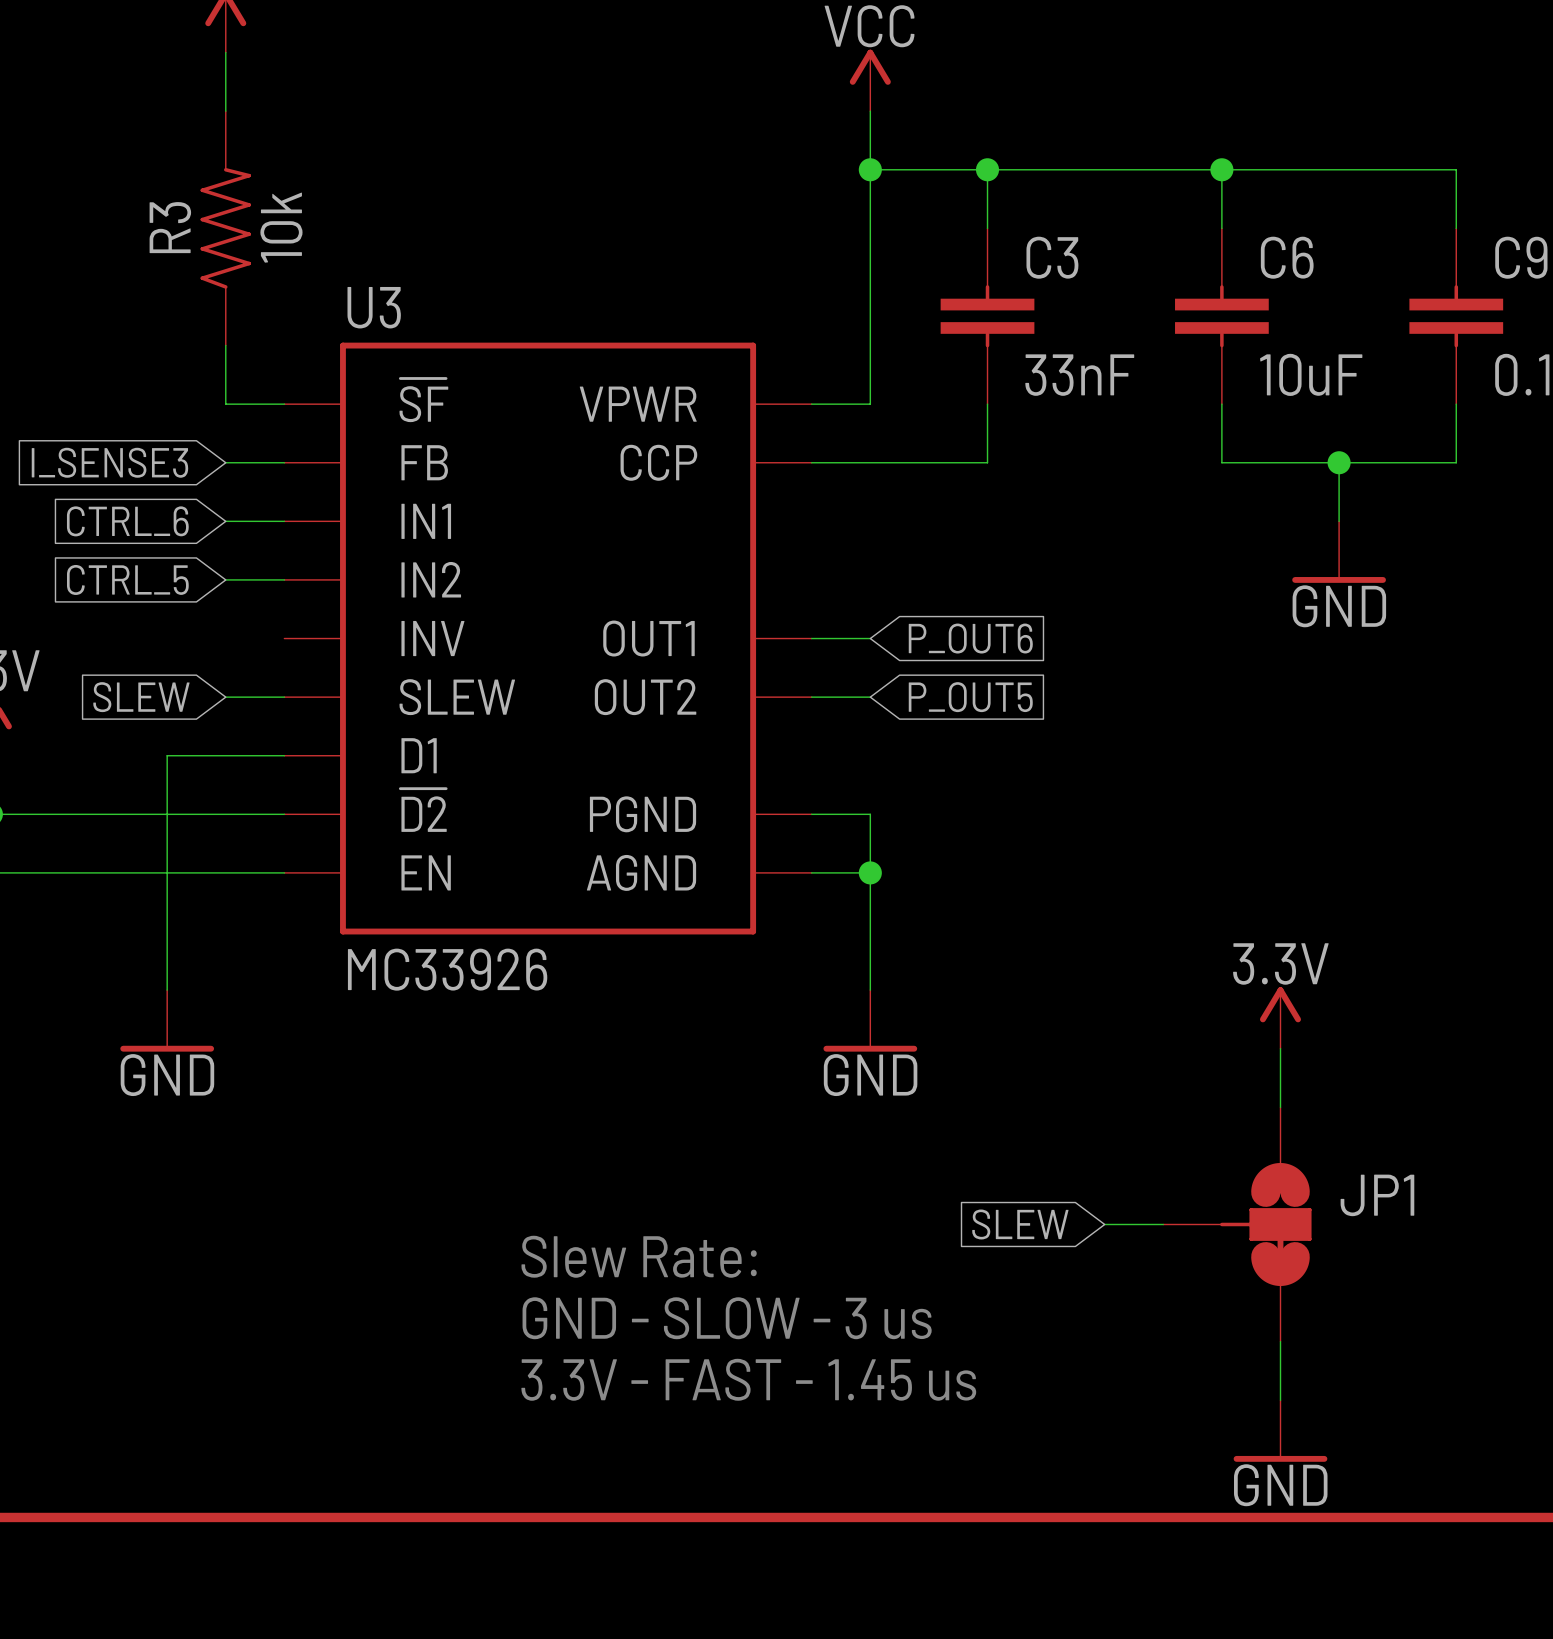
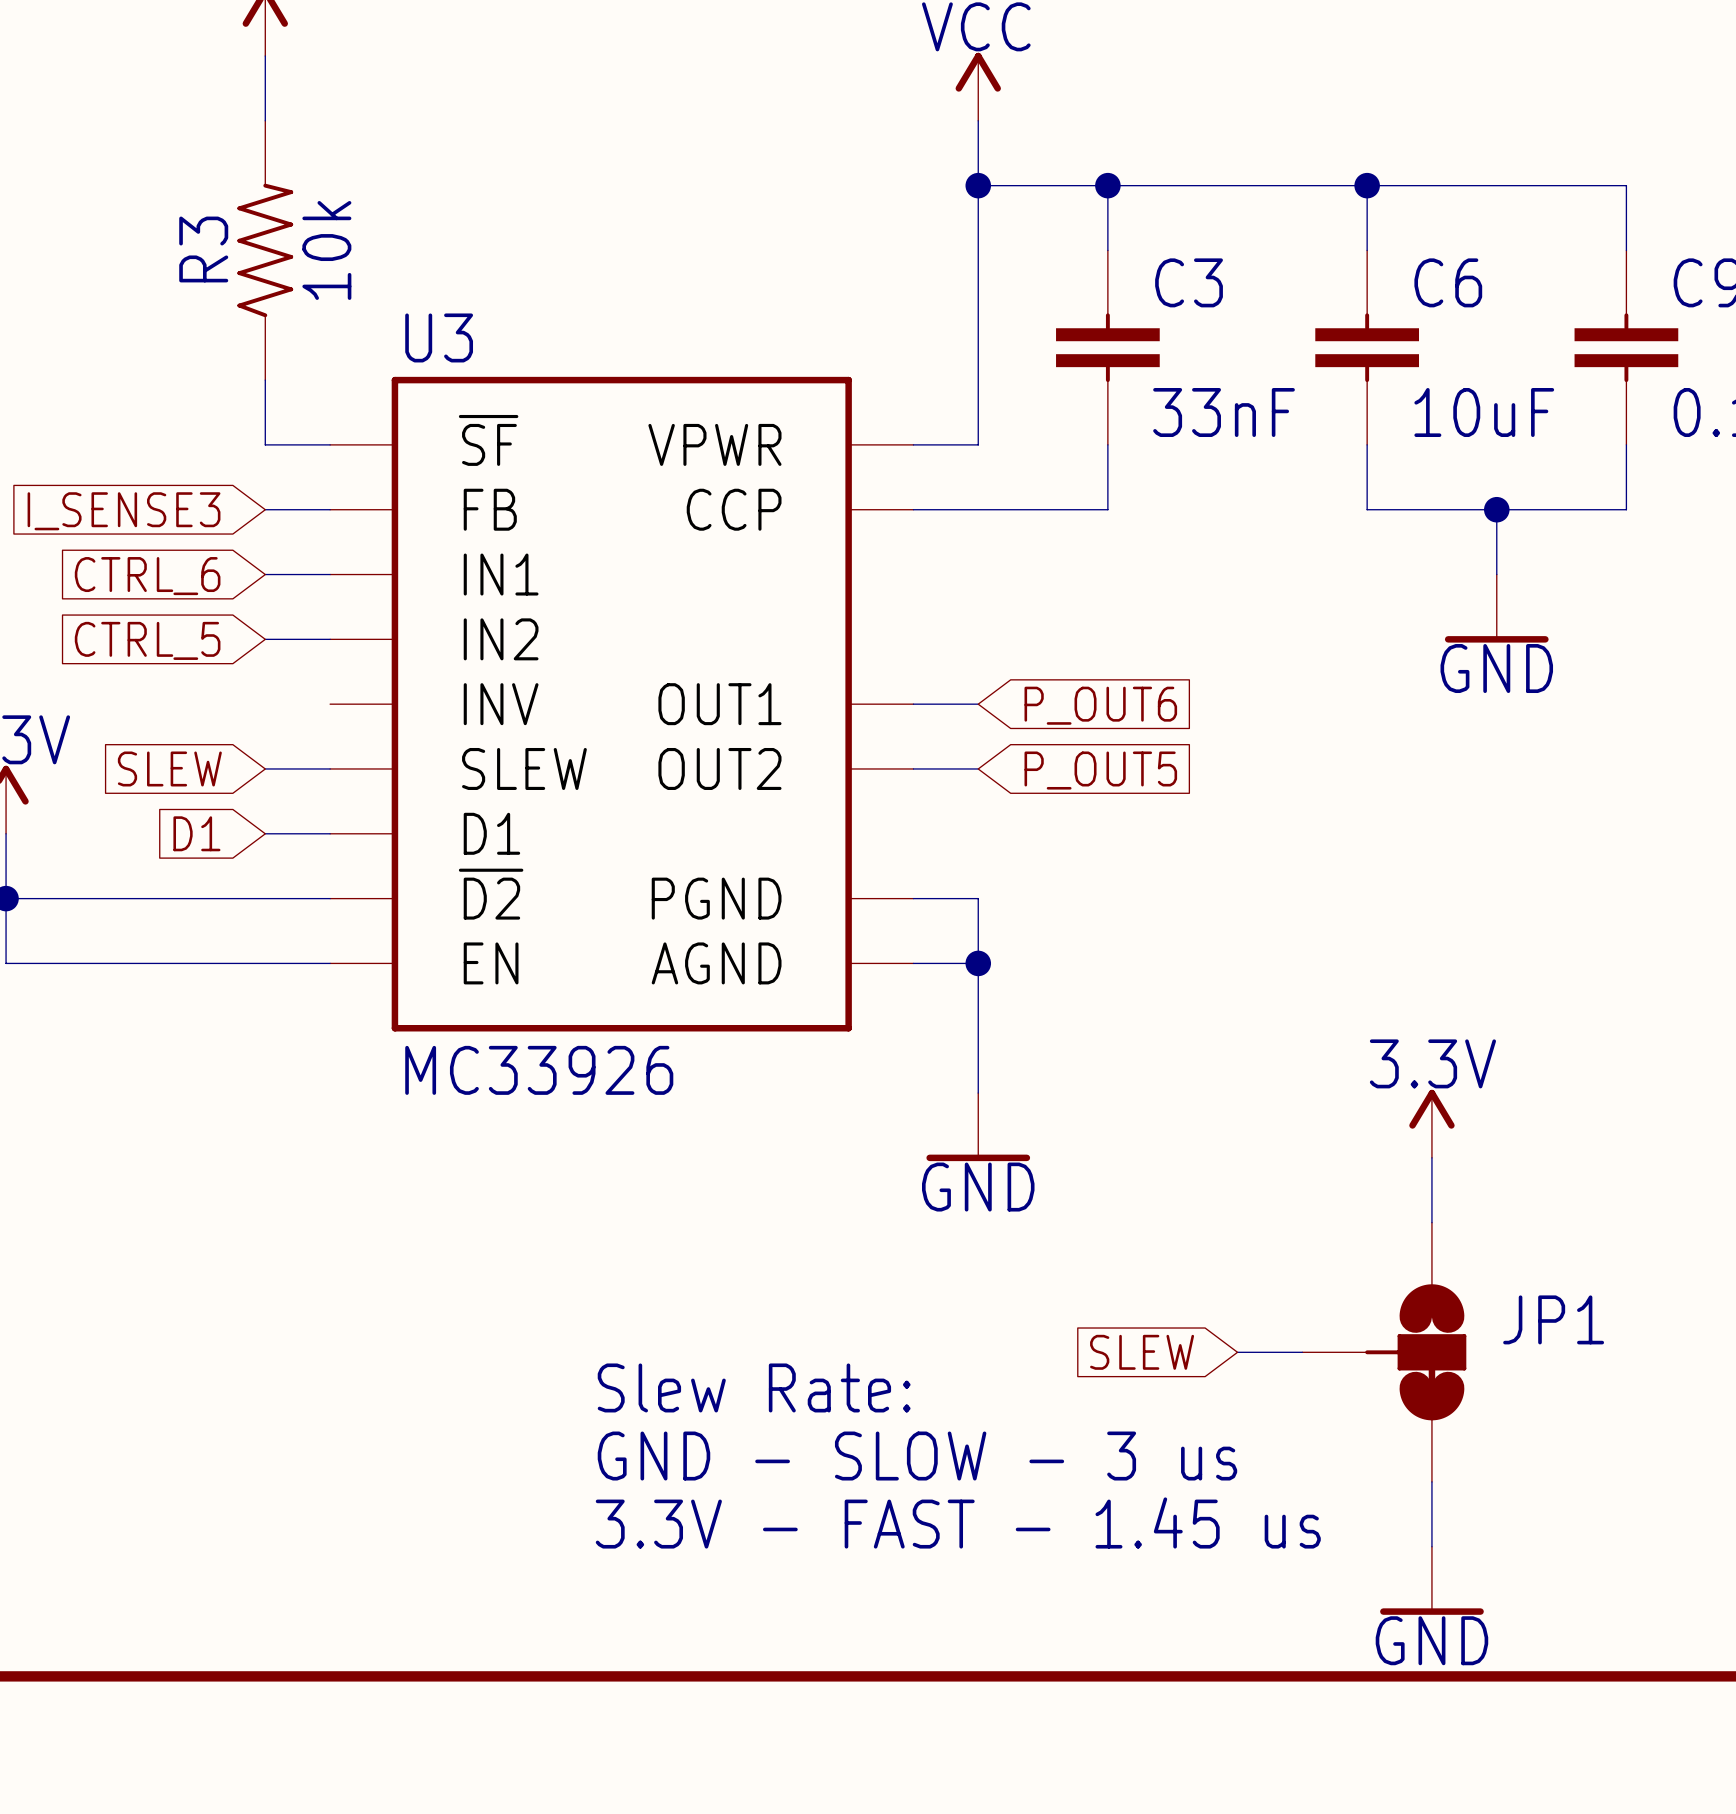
global label: none -> D1 (196, 833)
wire: (225, 755) (167, 755) (167, 990) -> none
power symbol: GND (167, 1020) -> none

